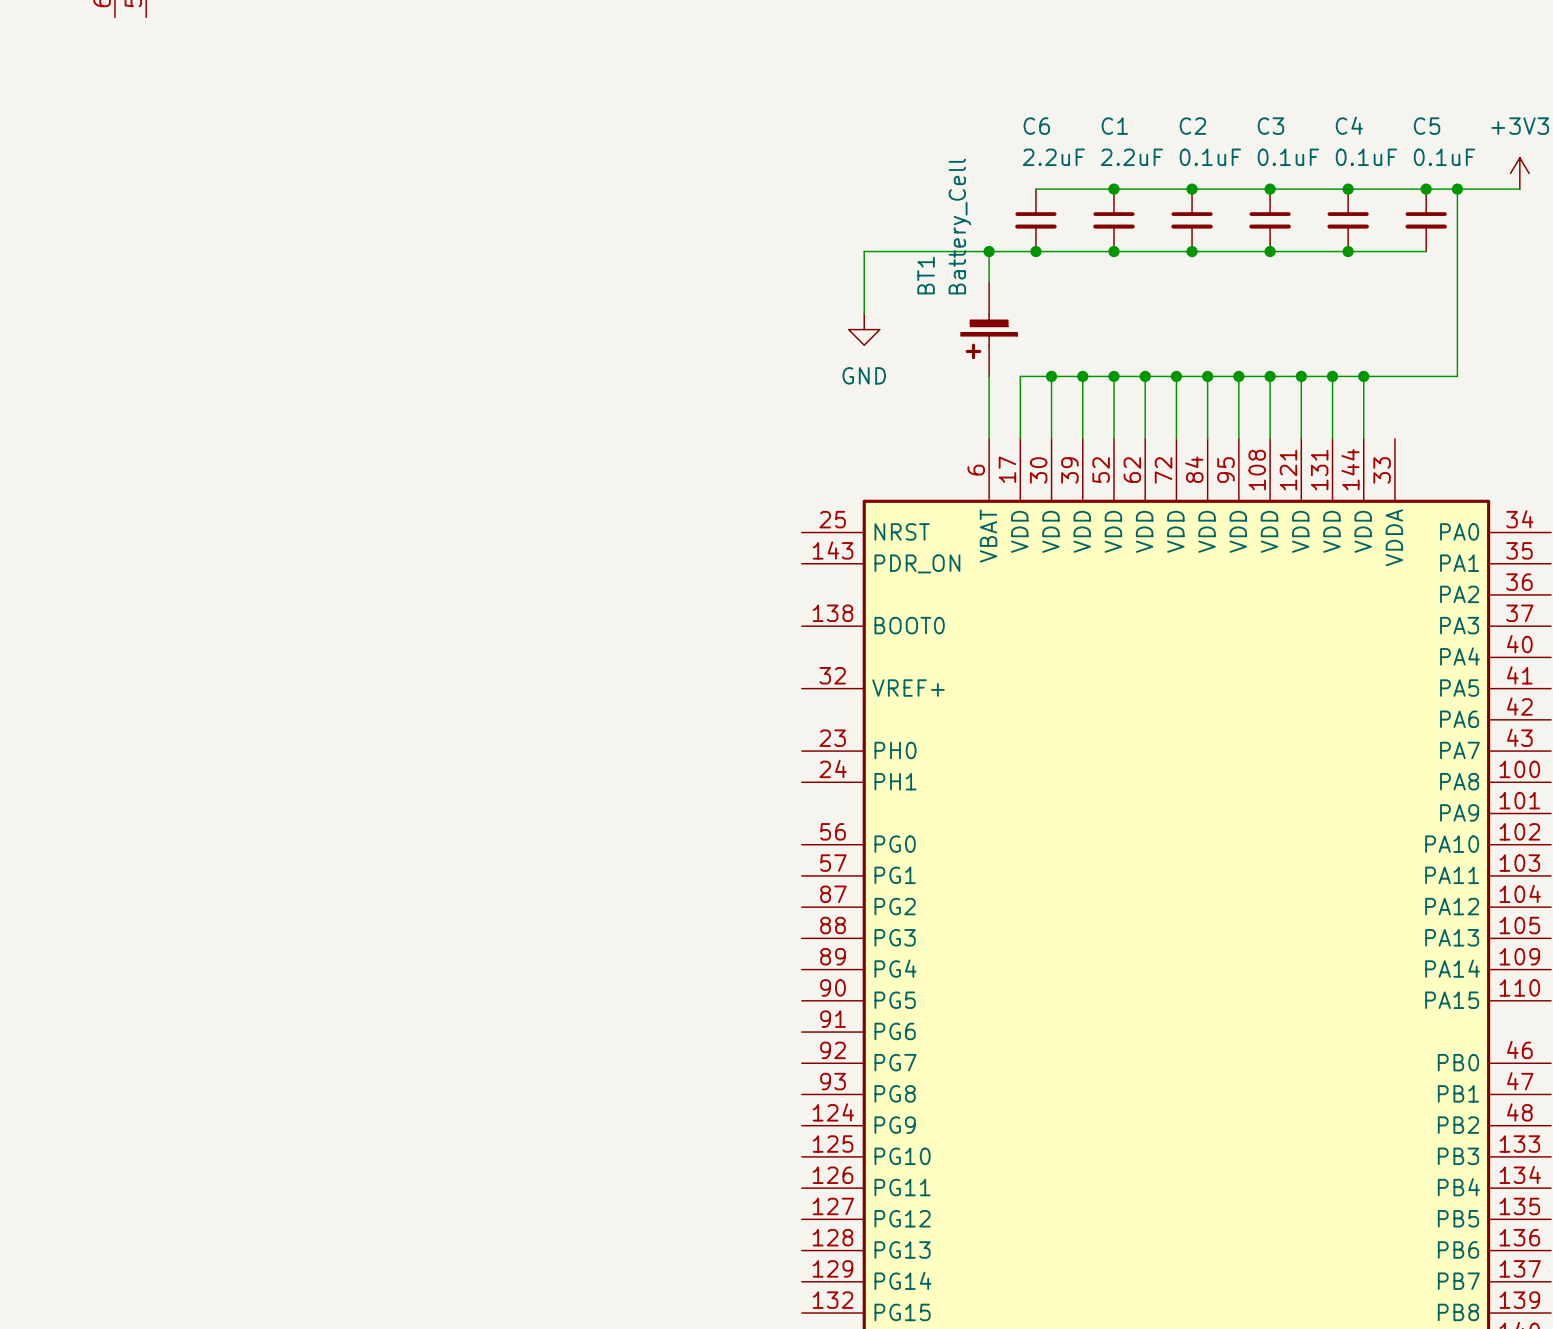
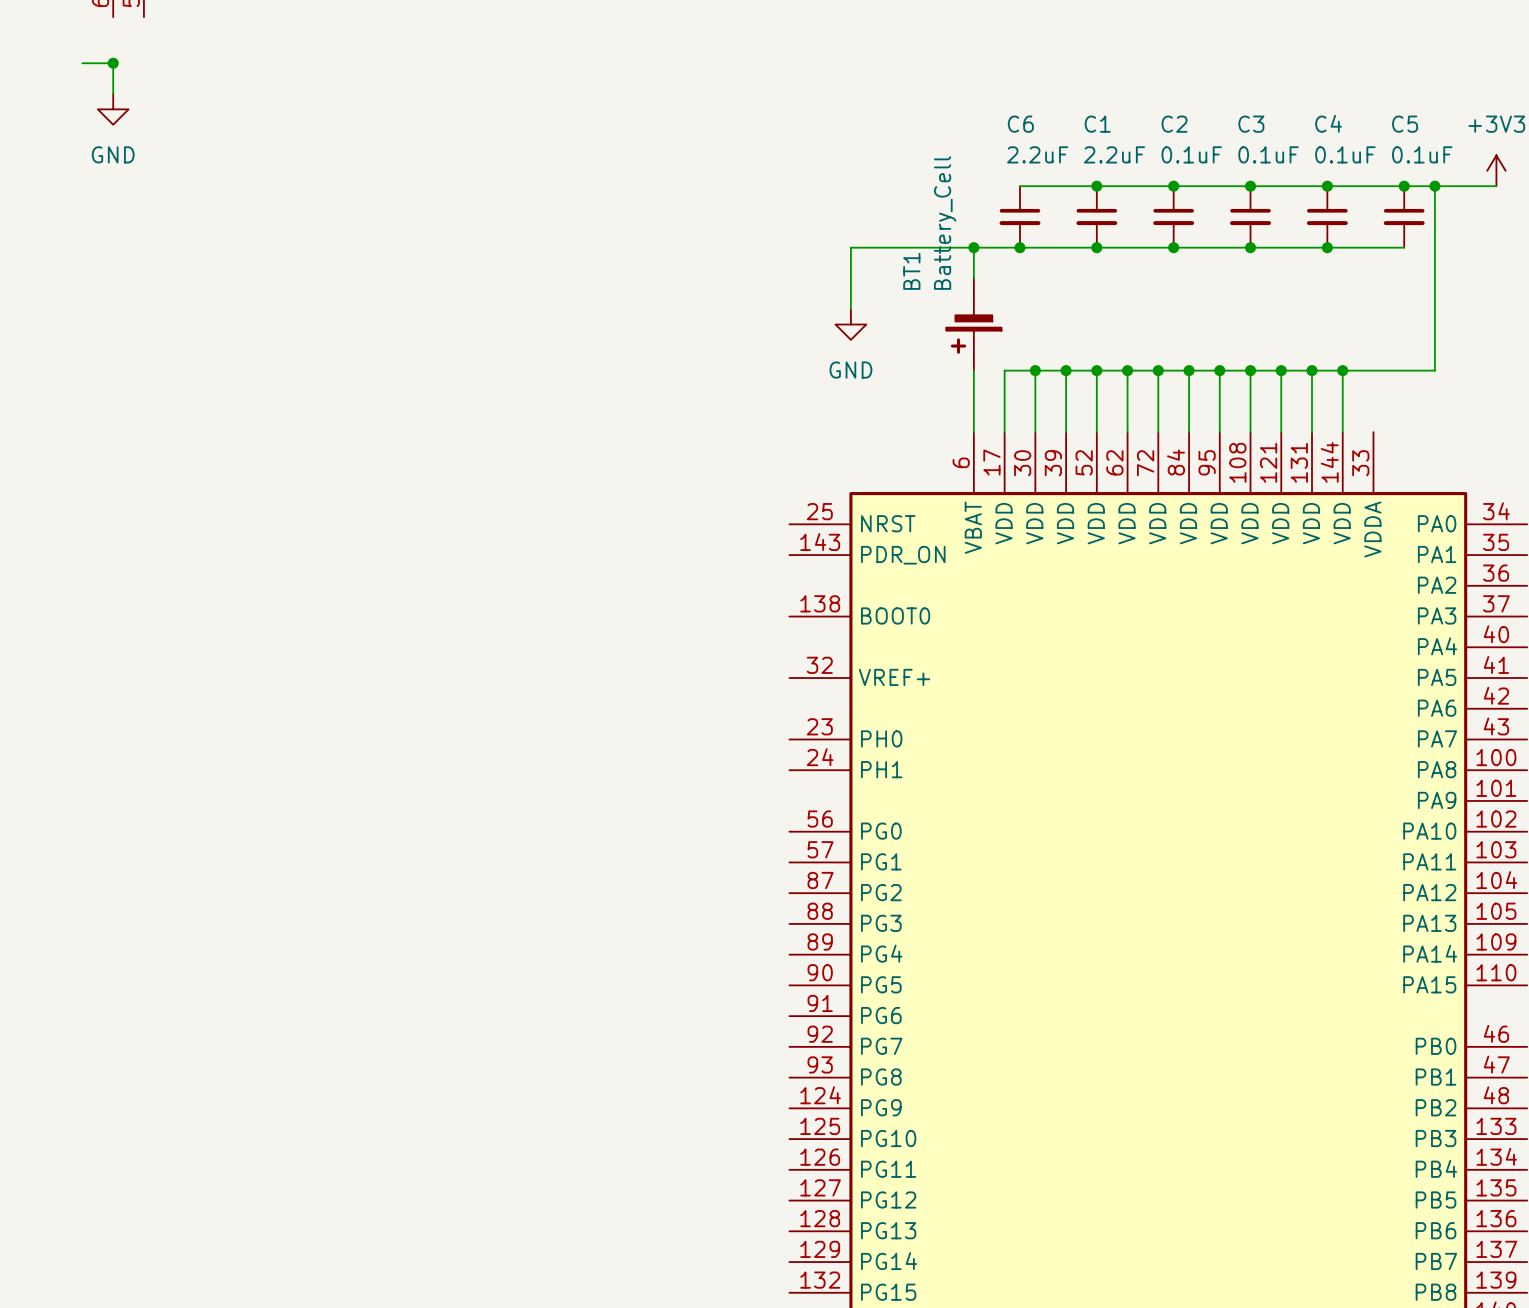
wire: none -> (82, 63) (113, 63) (113, 93)
junction: none -> (113, 63)
power symbol: none -> GND (113, 109)

